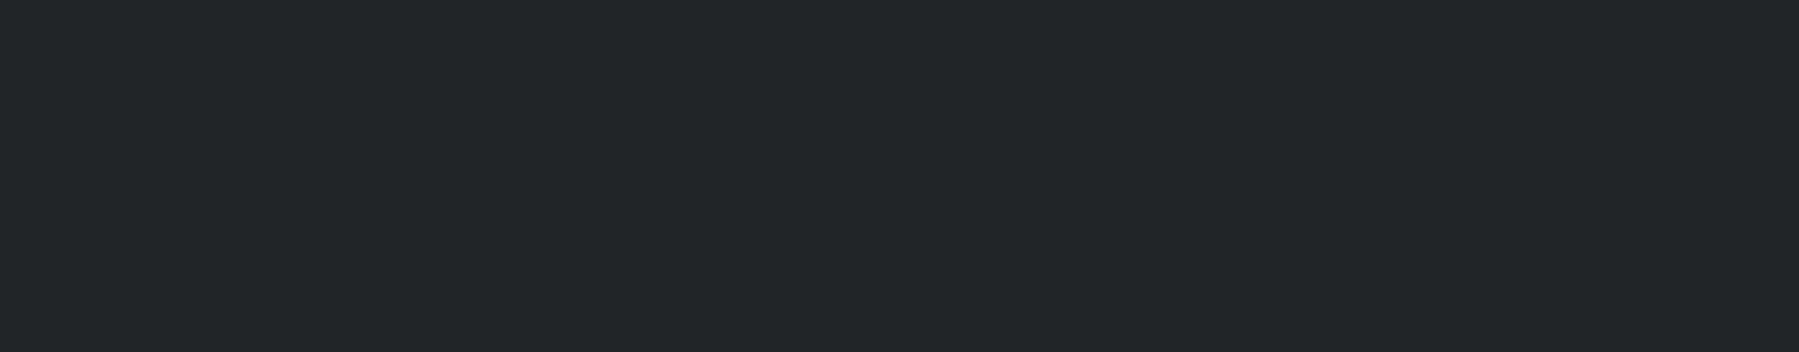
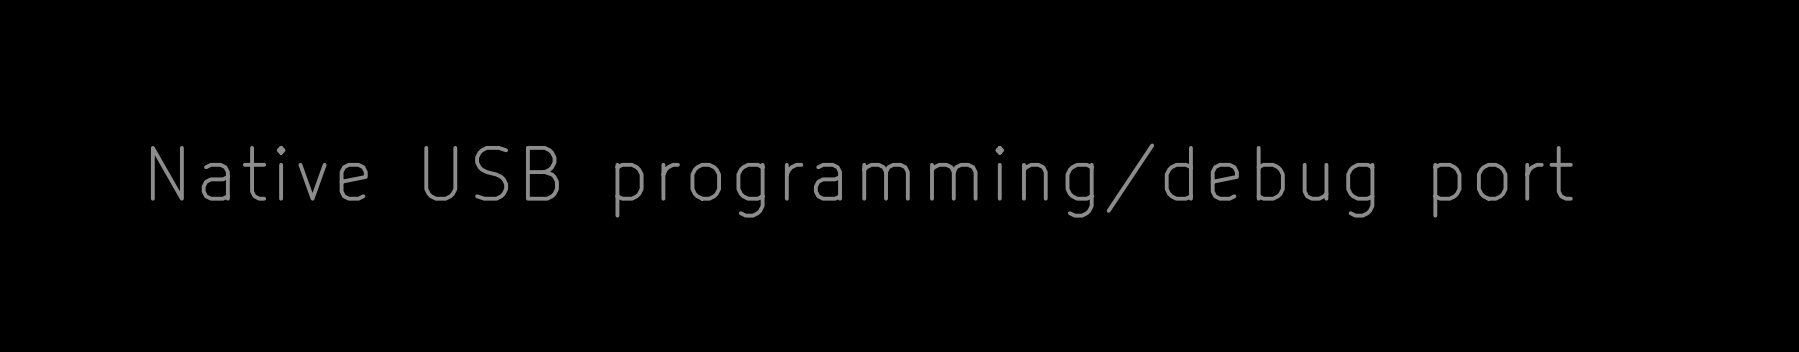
text: none -> Native USB programming/debug port (861, 180)

